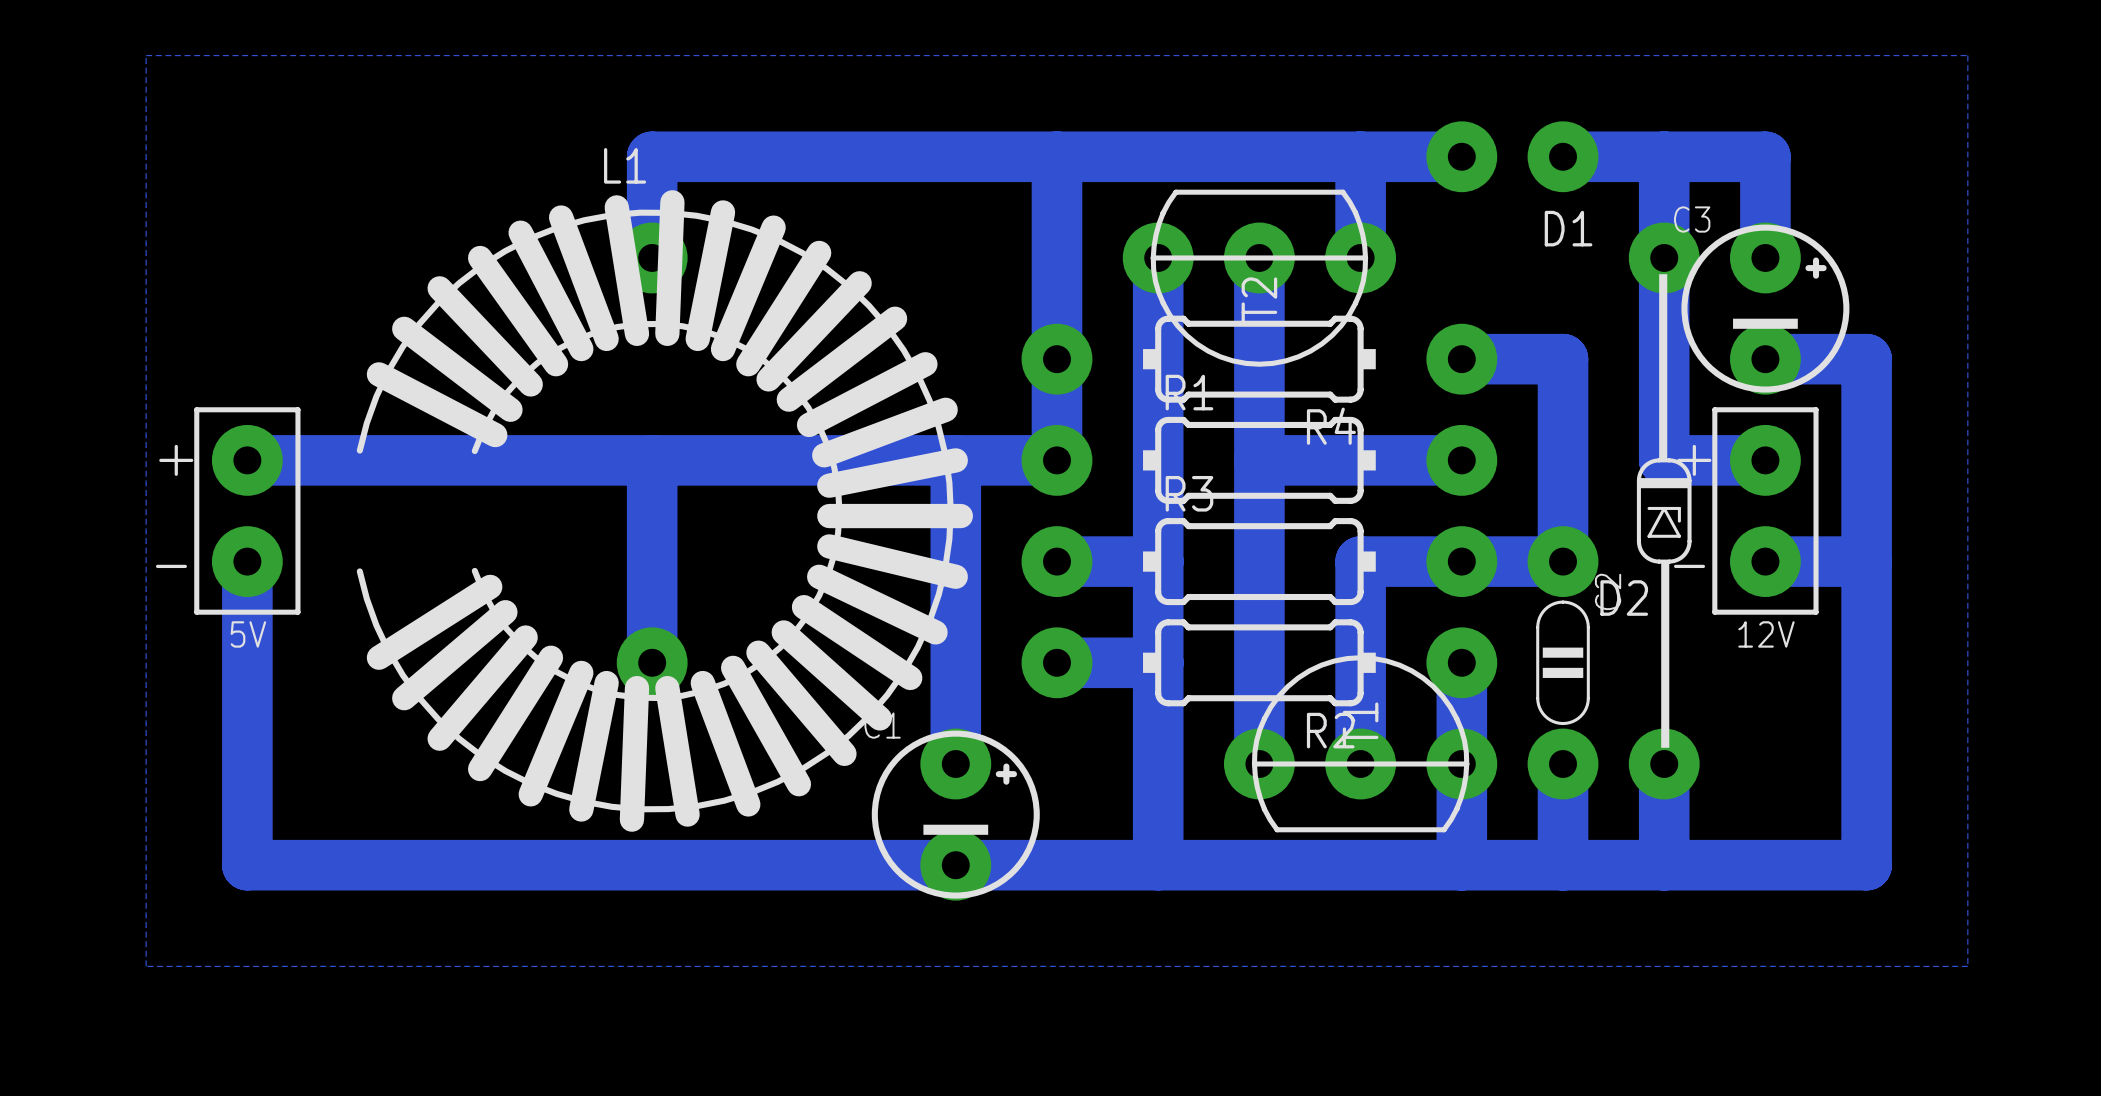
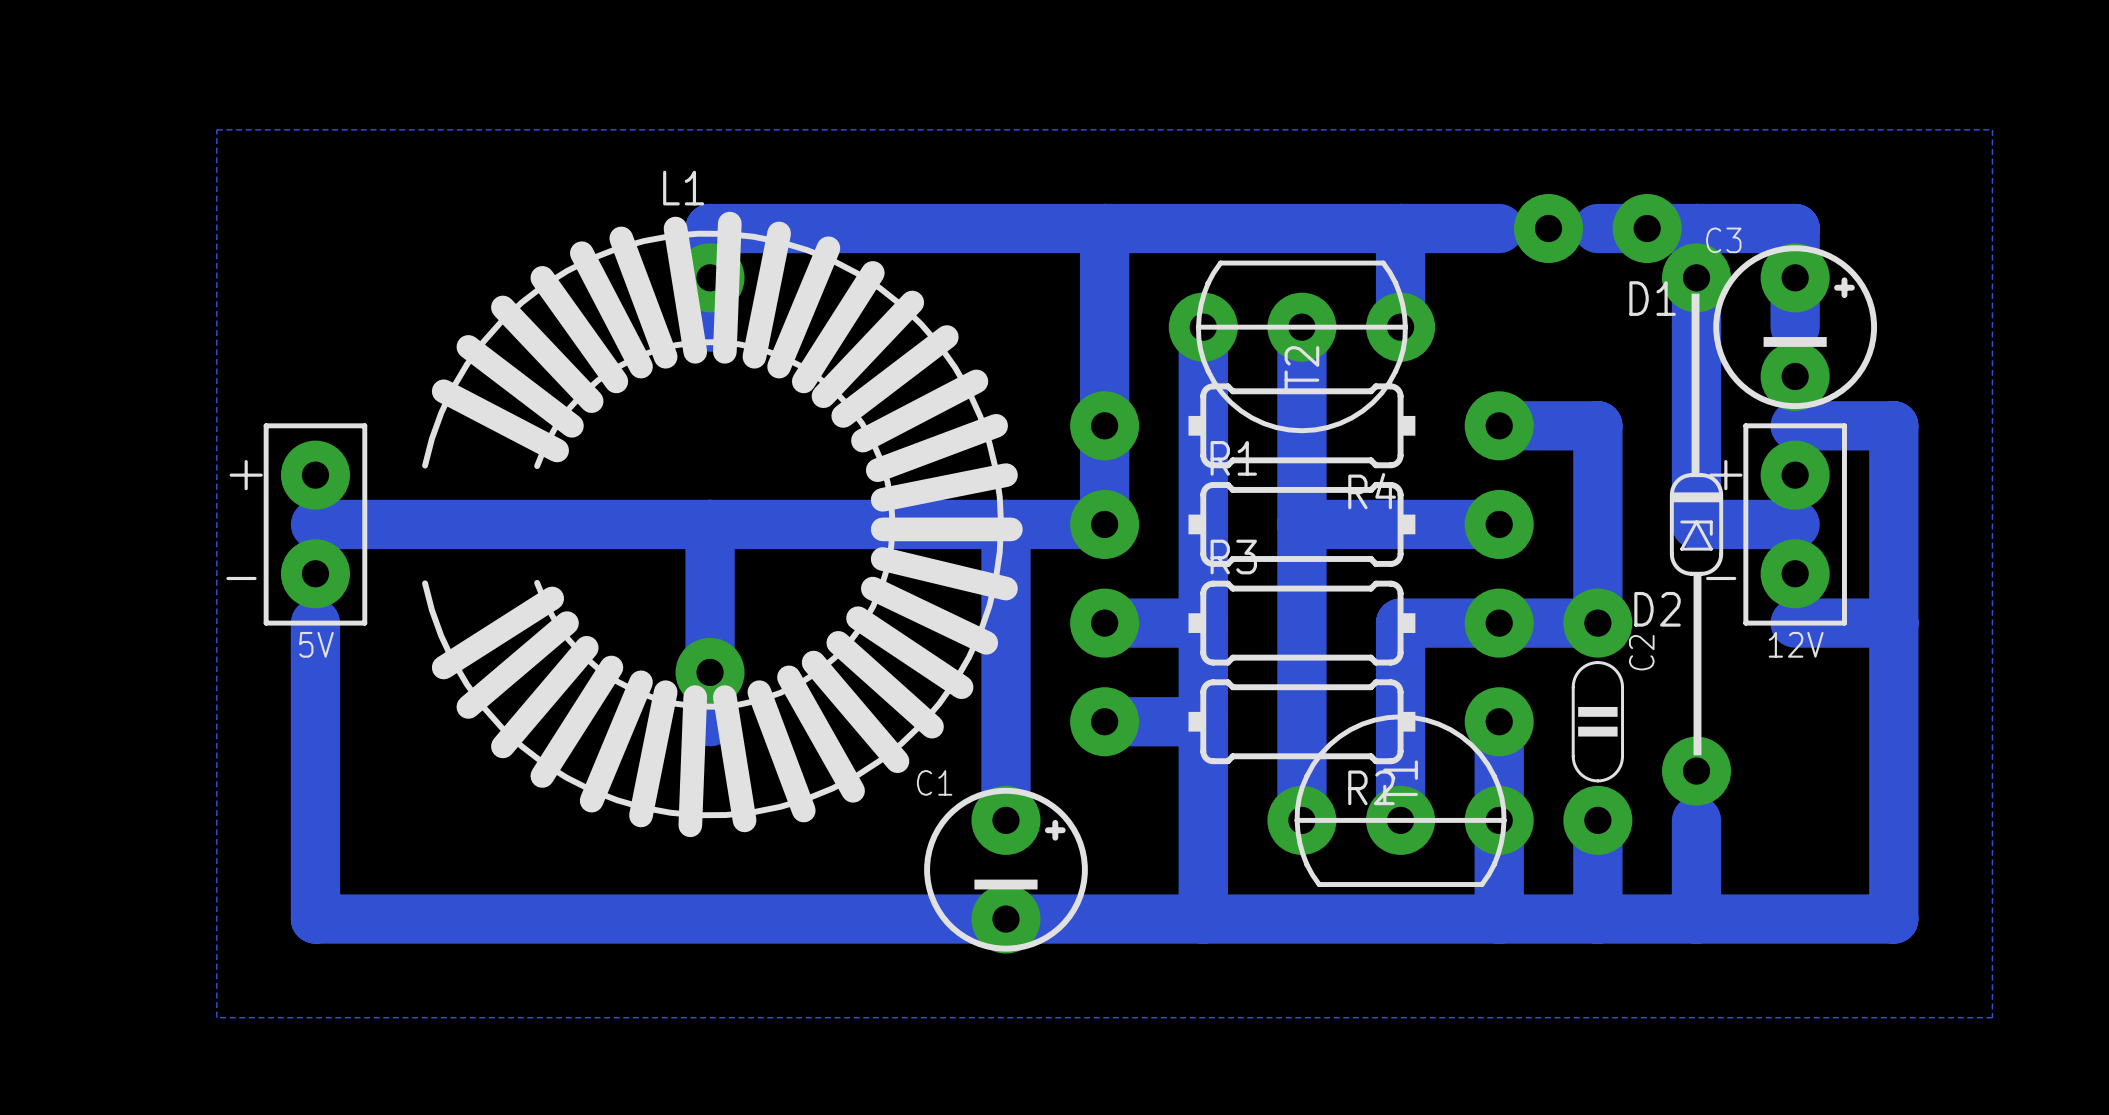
D1 position: (1512, 156) -> (1597, 228)
C3 position: (1765, 308) -> (1795, 327)
5V position: (247, 510) -> (315, 524)
L1 position: (664, 510) -> (722, 524)
D2 position: (1664, 510) -> (1696, 524)
12V position: (1765, 510) -> (1795, 524)

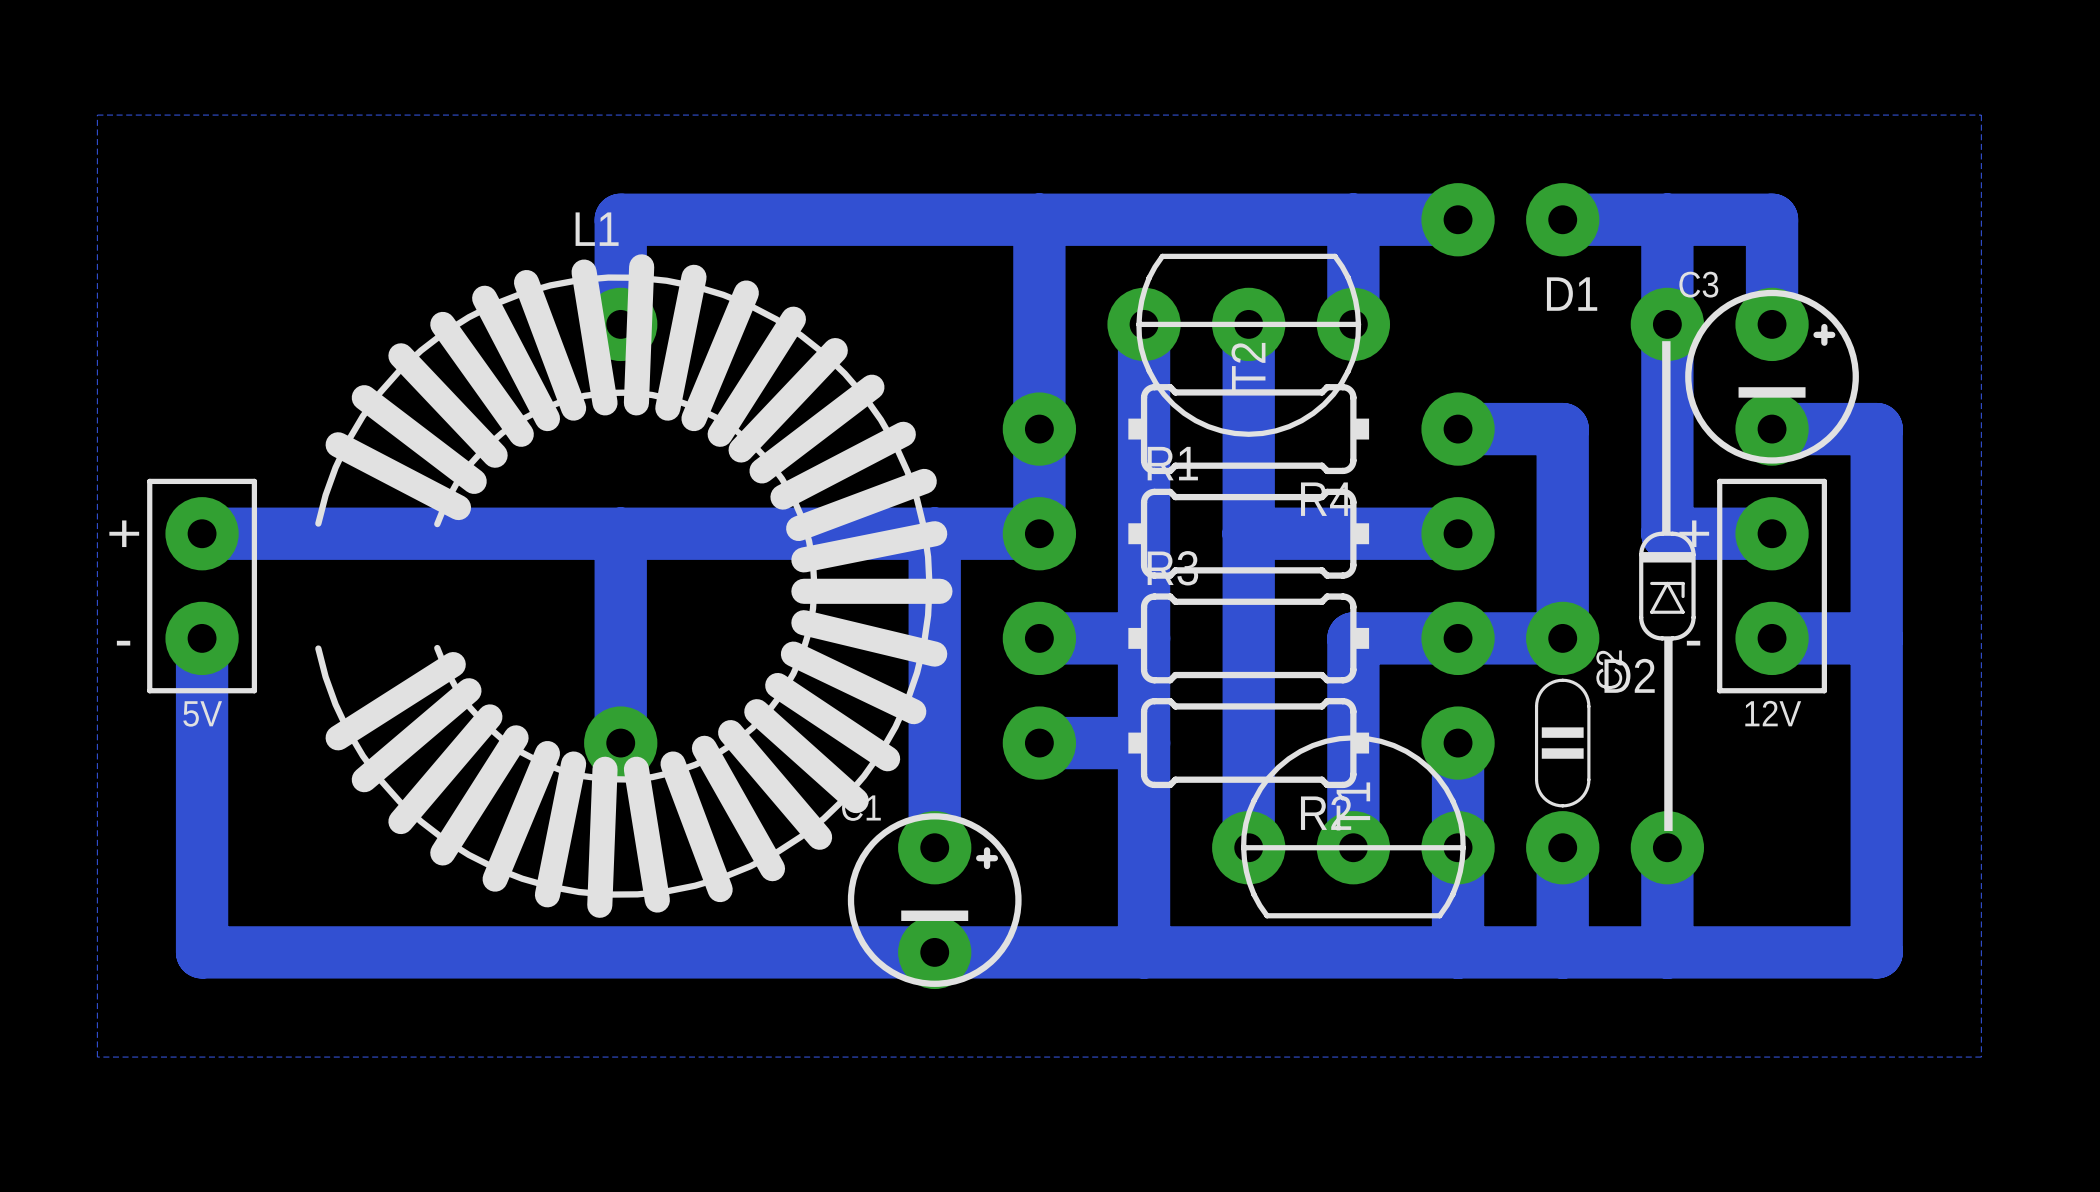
D1 position: (1597, 228) -> (1510, 219)
C3 position: (1795, 327) -> (1772, 376)
5V position: (315, 524) -> (202, 586)
L1 position: (722, 524) -> (633, 586)
D2 position: (1696, 524) -> (1667, 586)
12V position: (1795, 524) -> (1772, 586)

